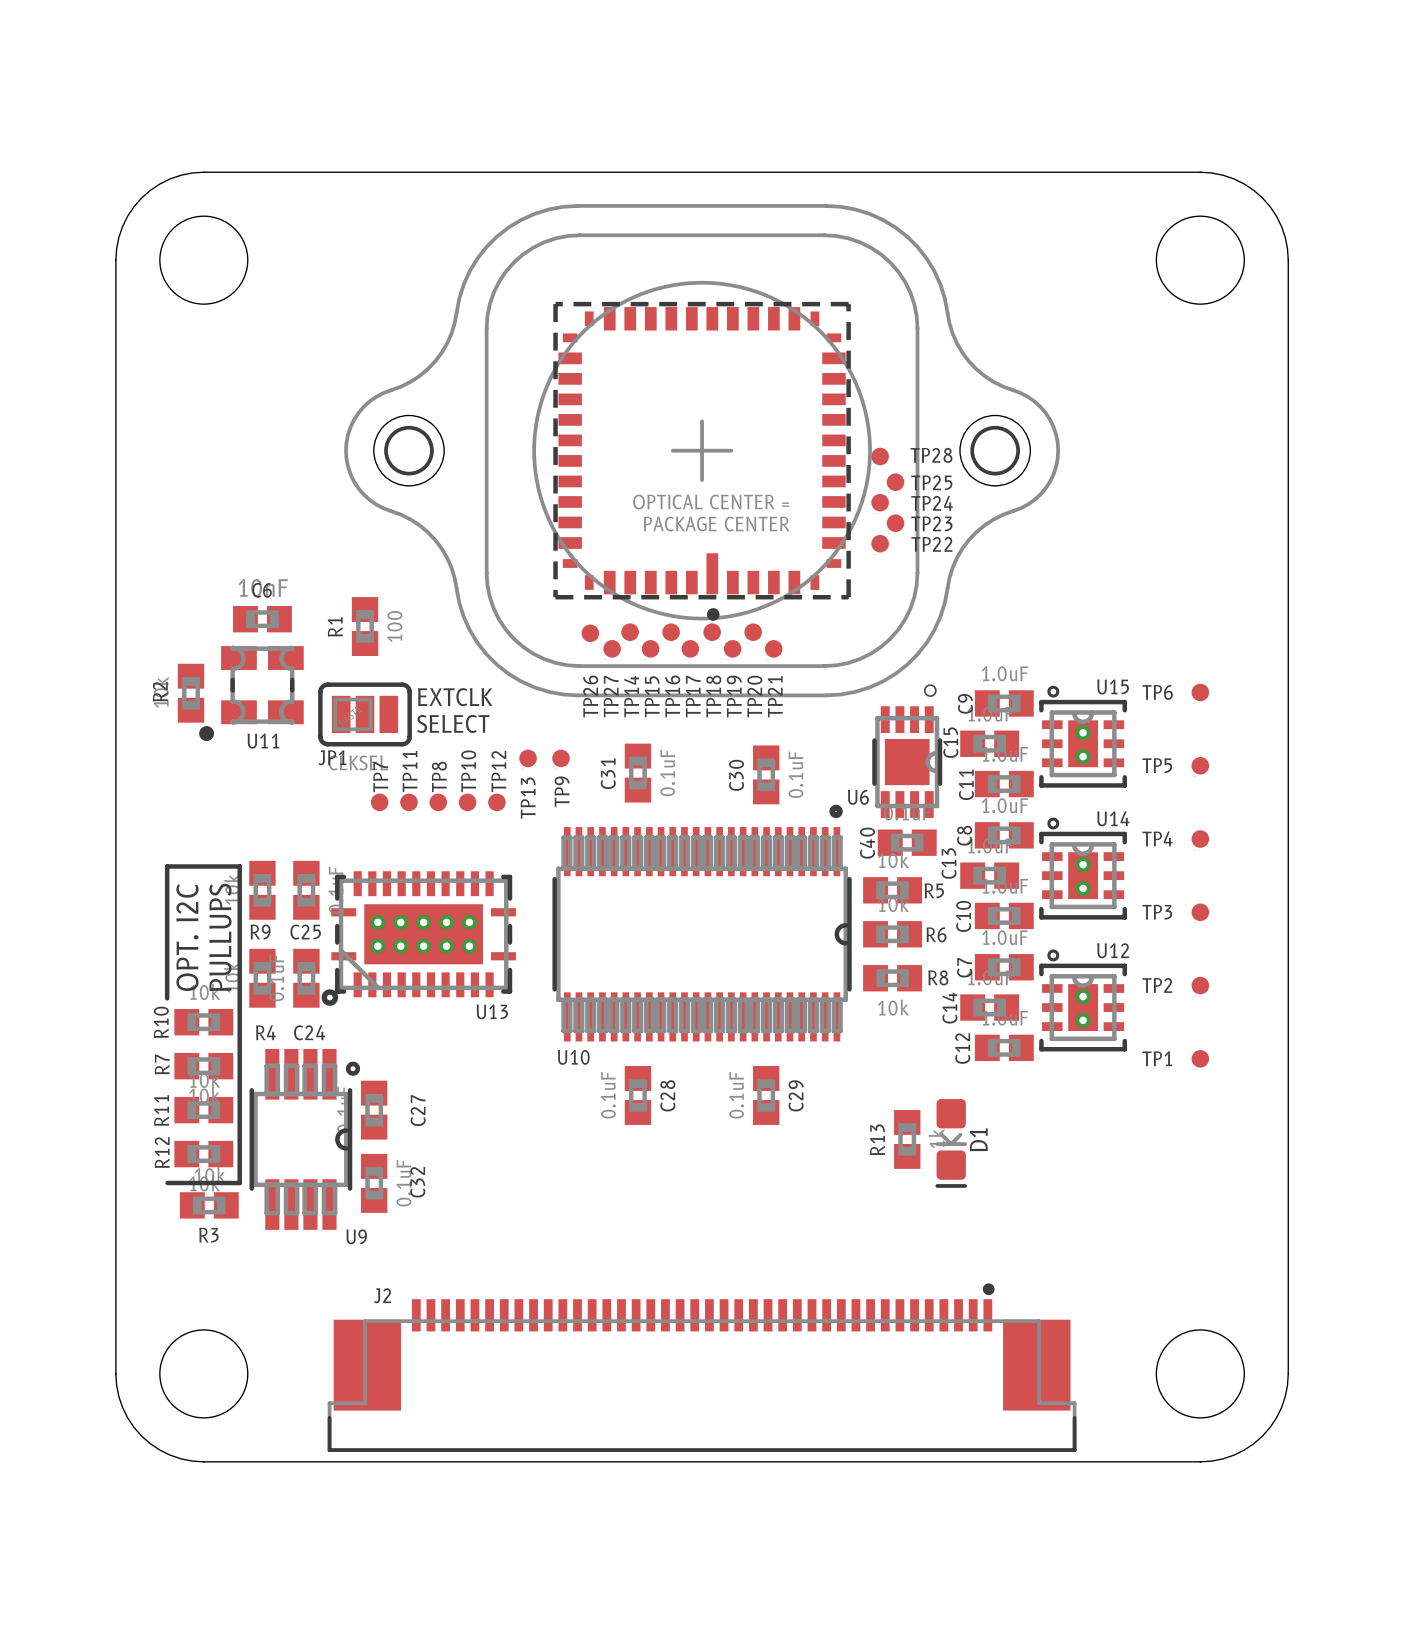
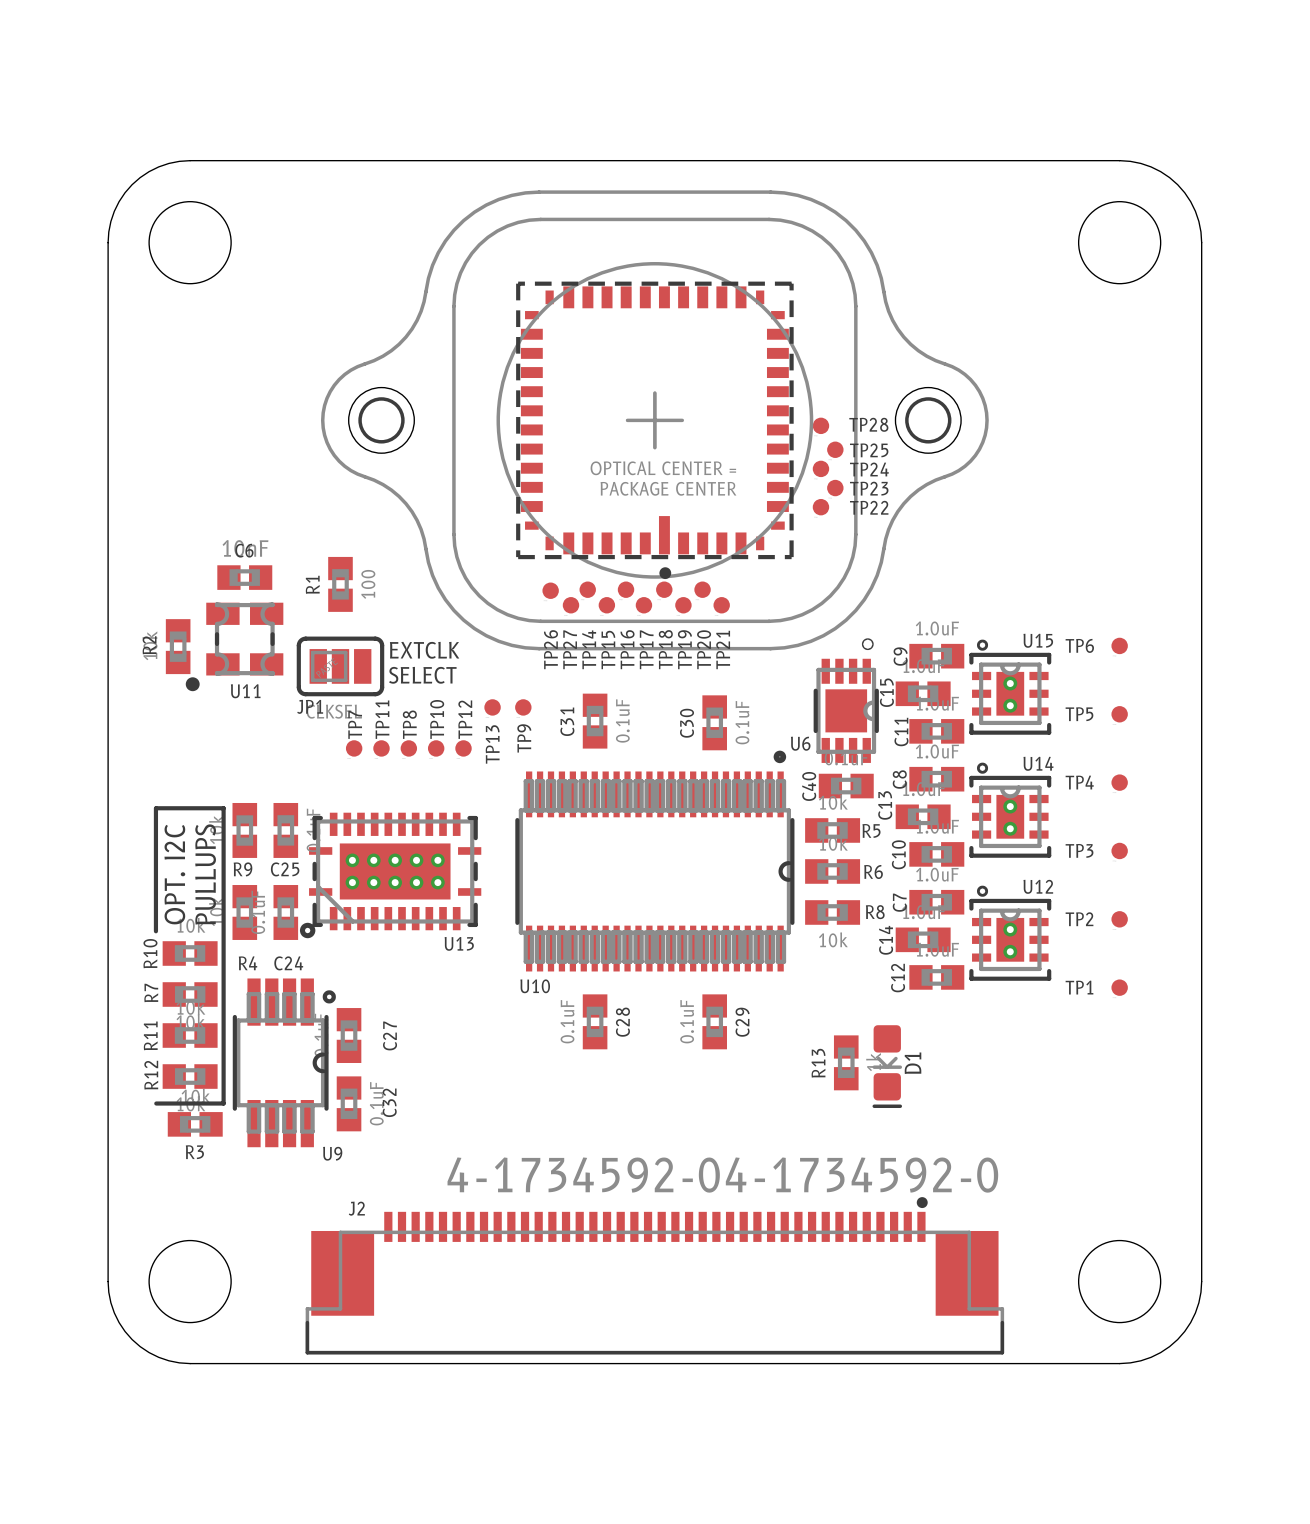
J2 value: none -> 4-1734592-04-1734592-0 (722, 1175)

